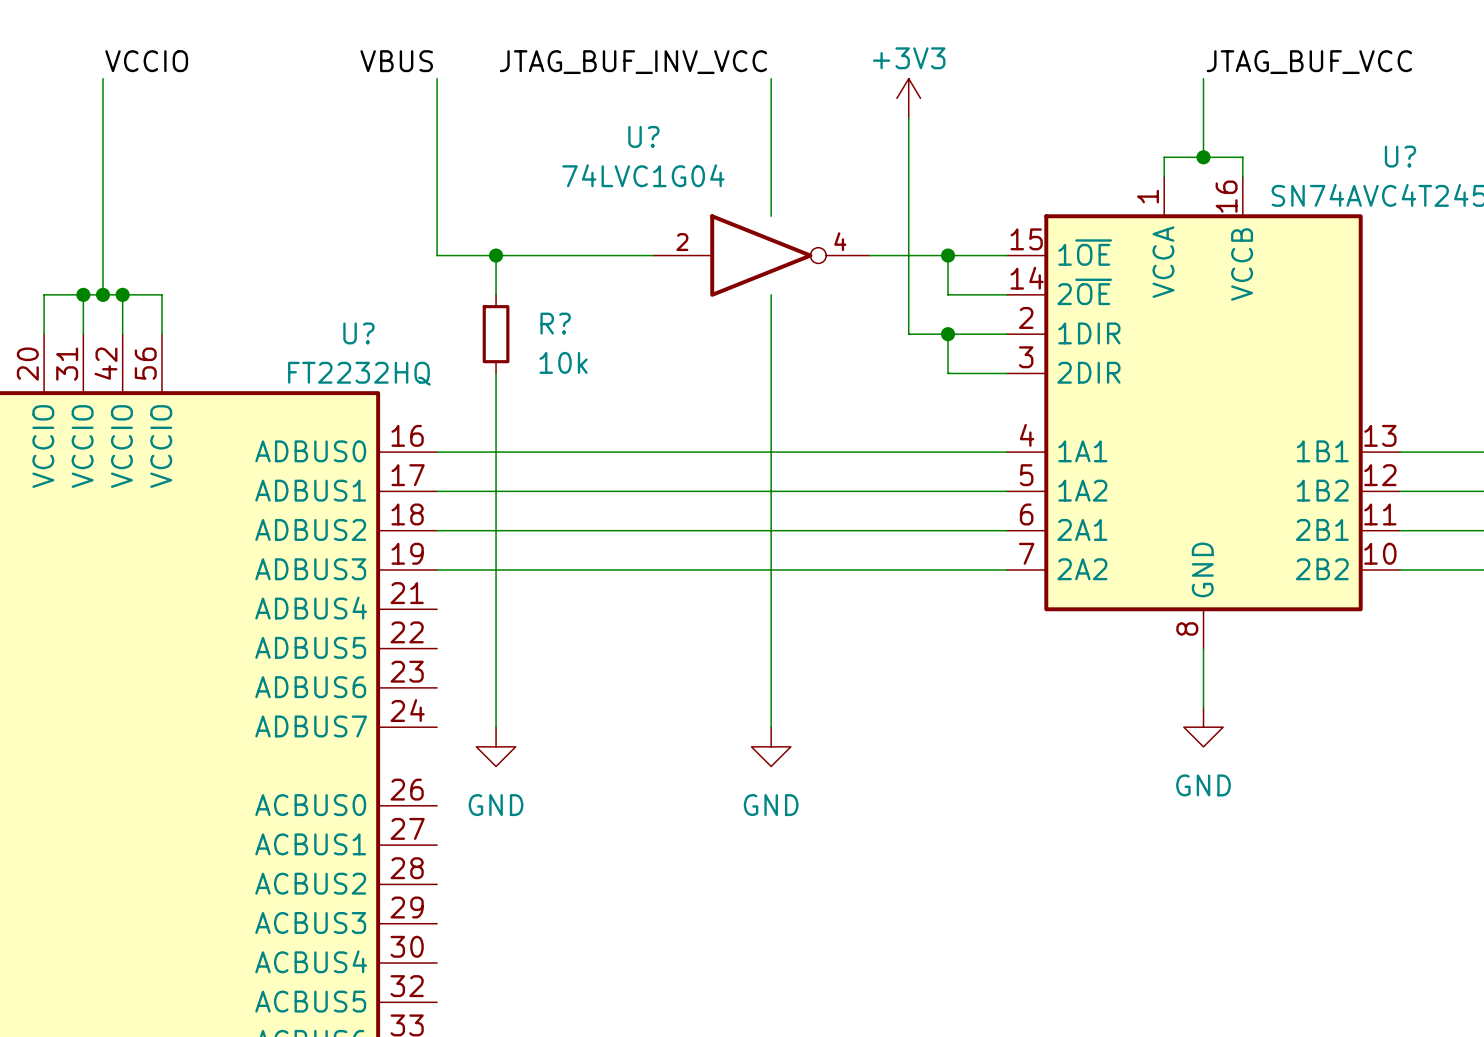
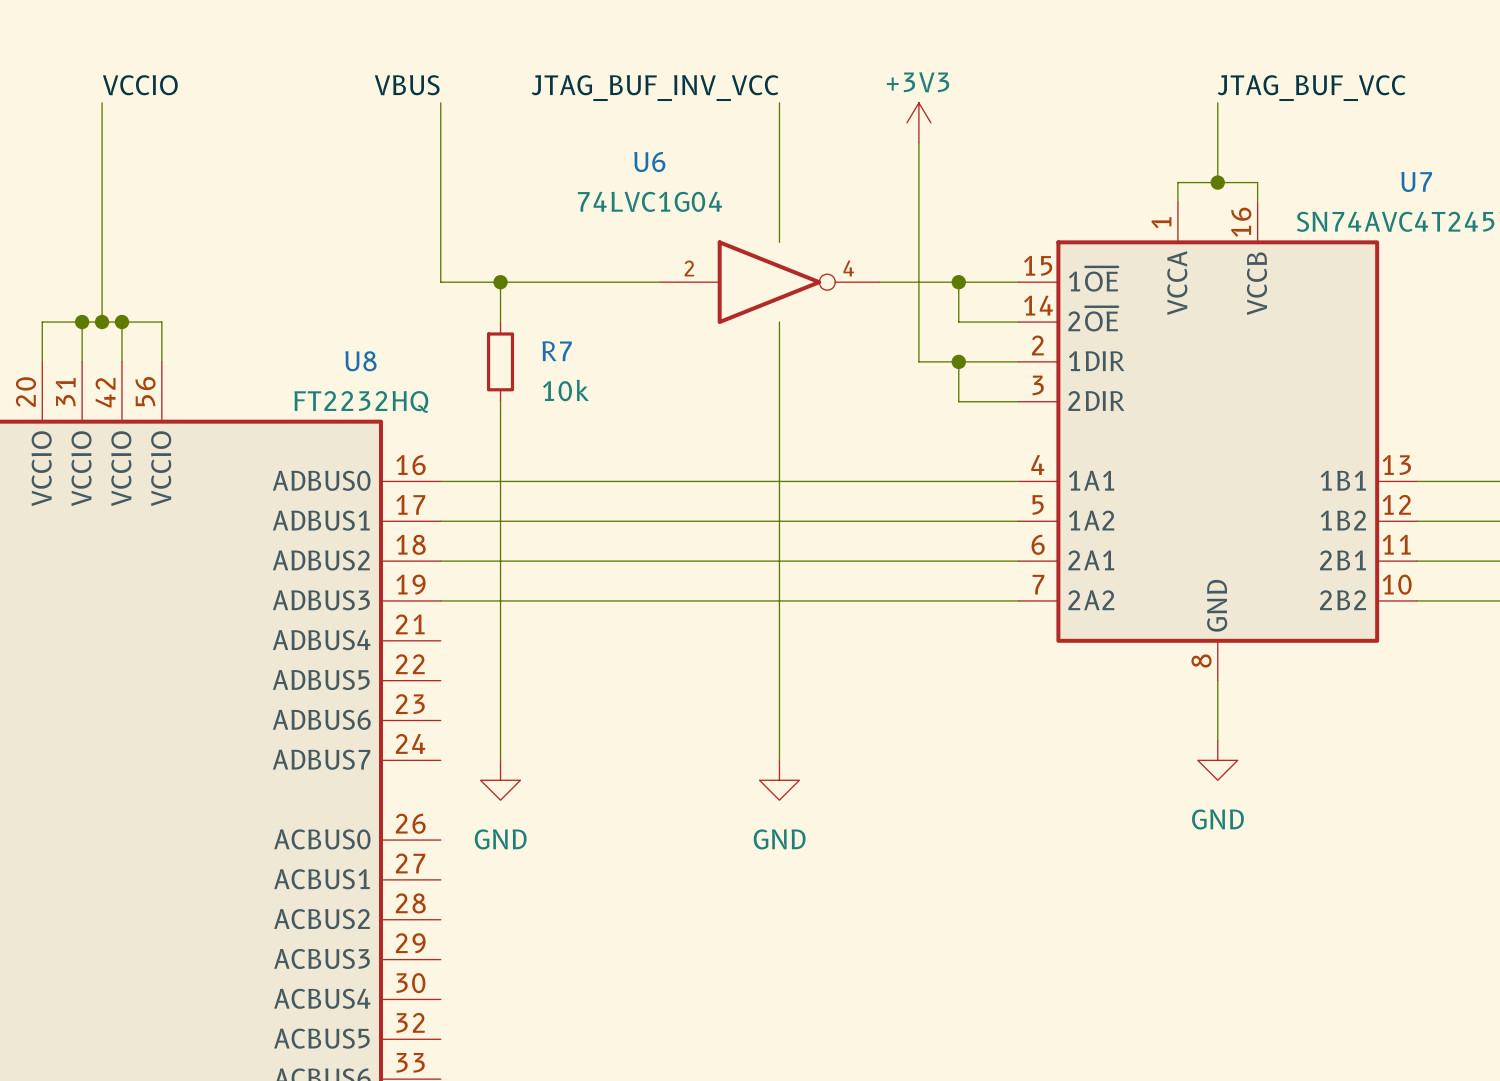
U? name: U? (643, 136) -> U6 (649, 162)
U? name: U? (1400, 156) -> U7 (1416, 181)
R? name: R? (555, 323) -> R7 (557, 351)
U? name: U? (358, 333) -> U8 (360, 361)

